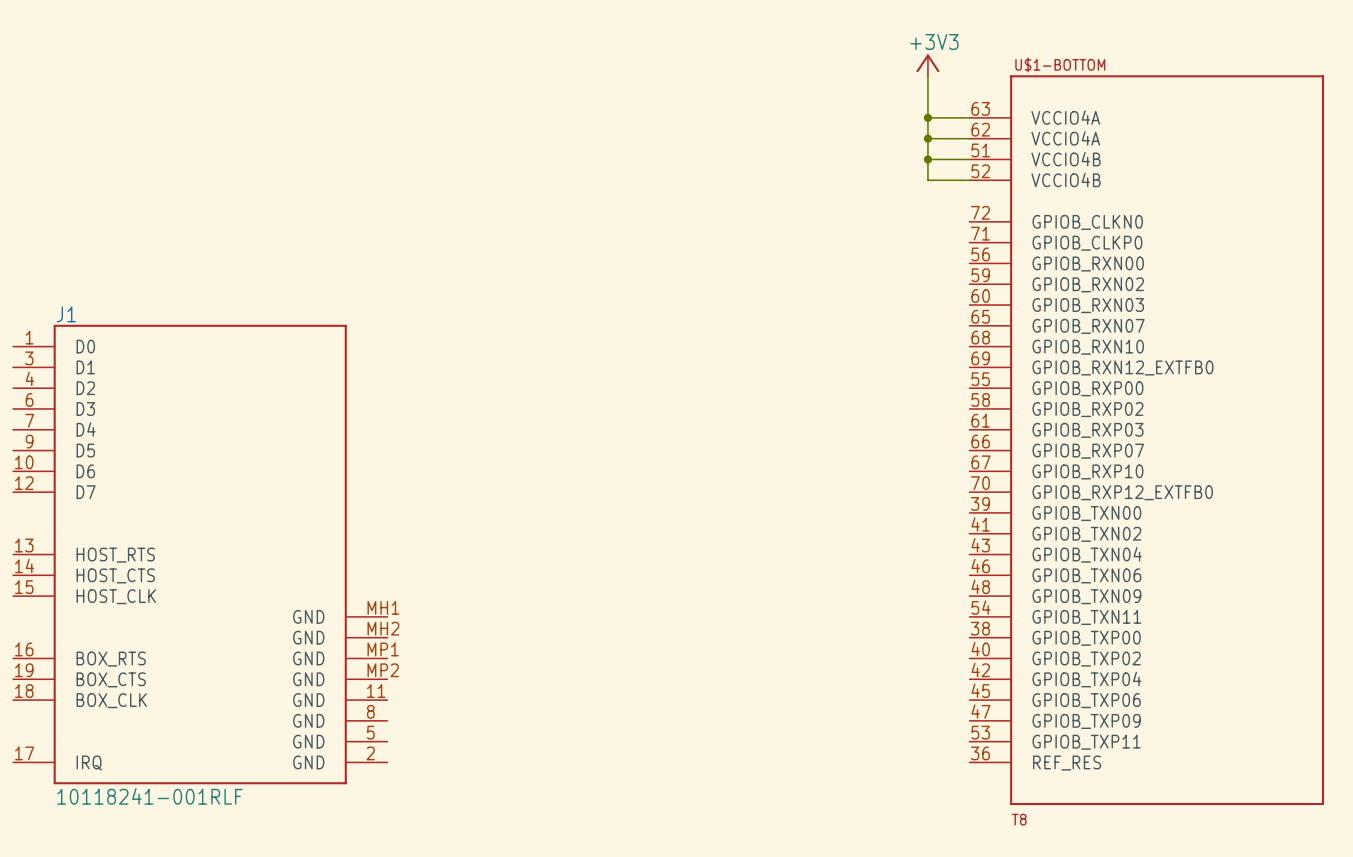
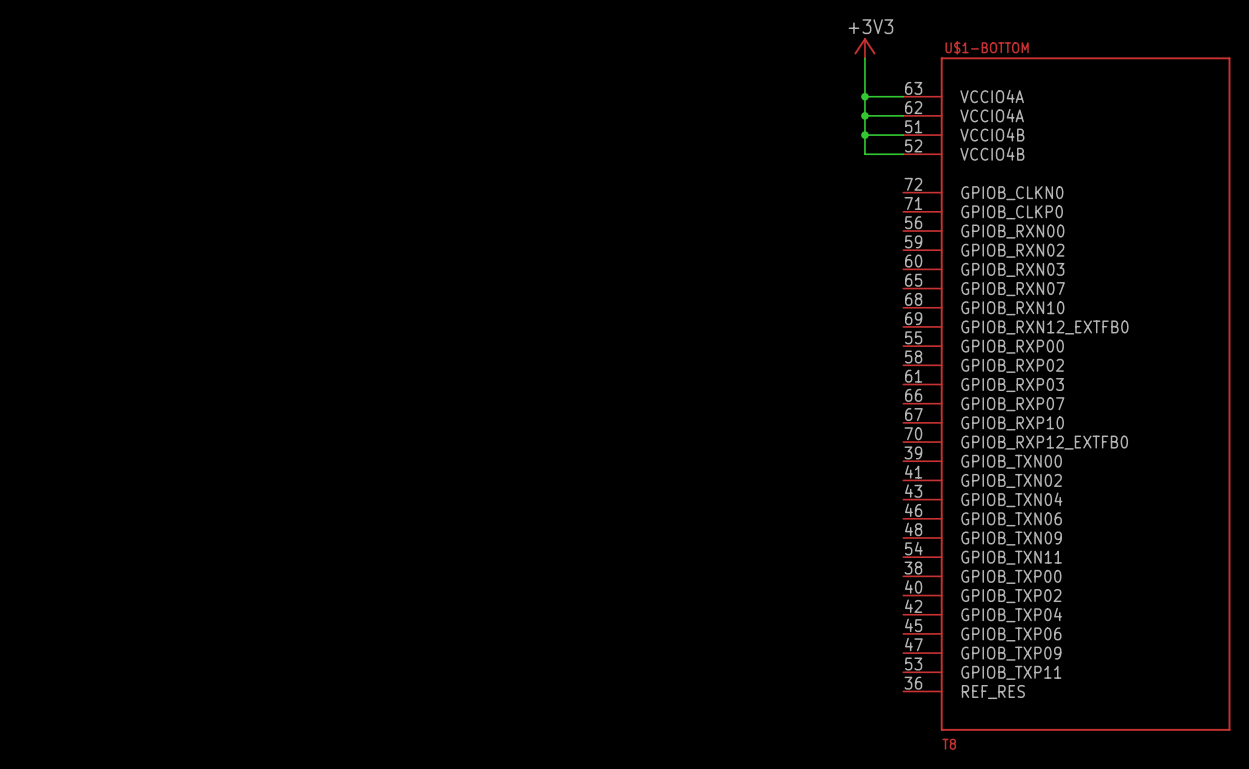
J1: 10118241-001RLF (200, 554) -> none

